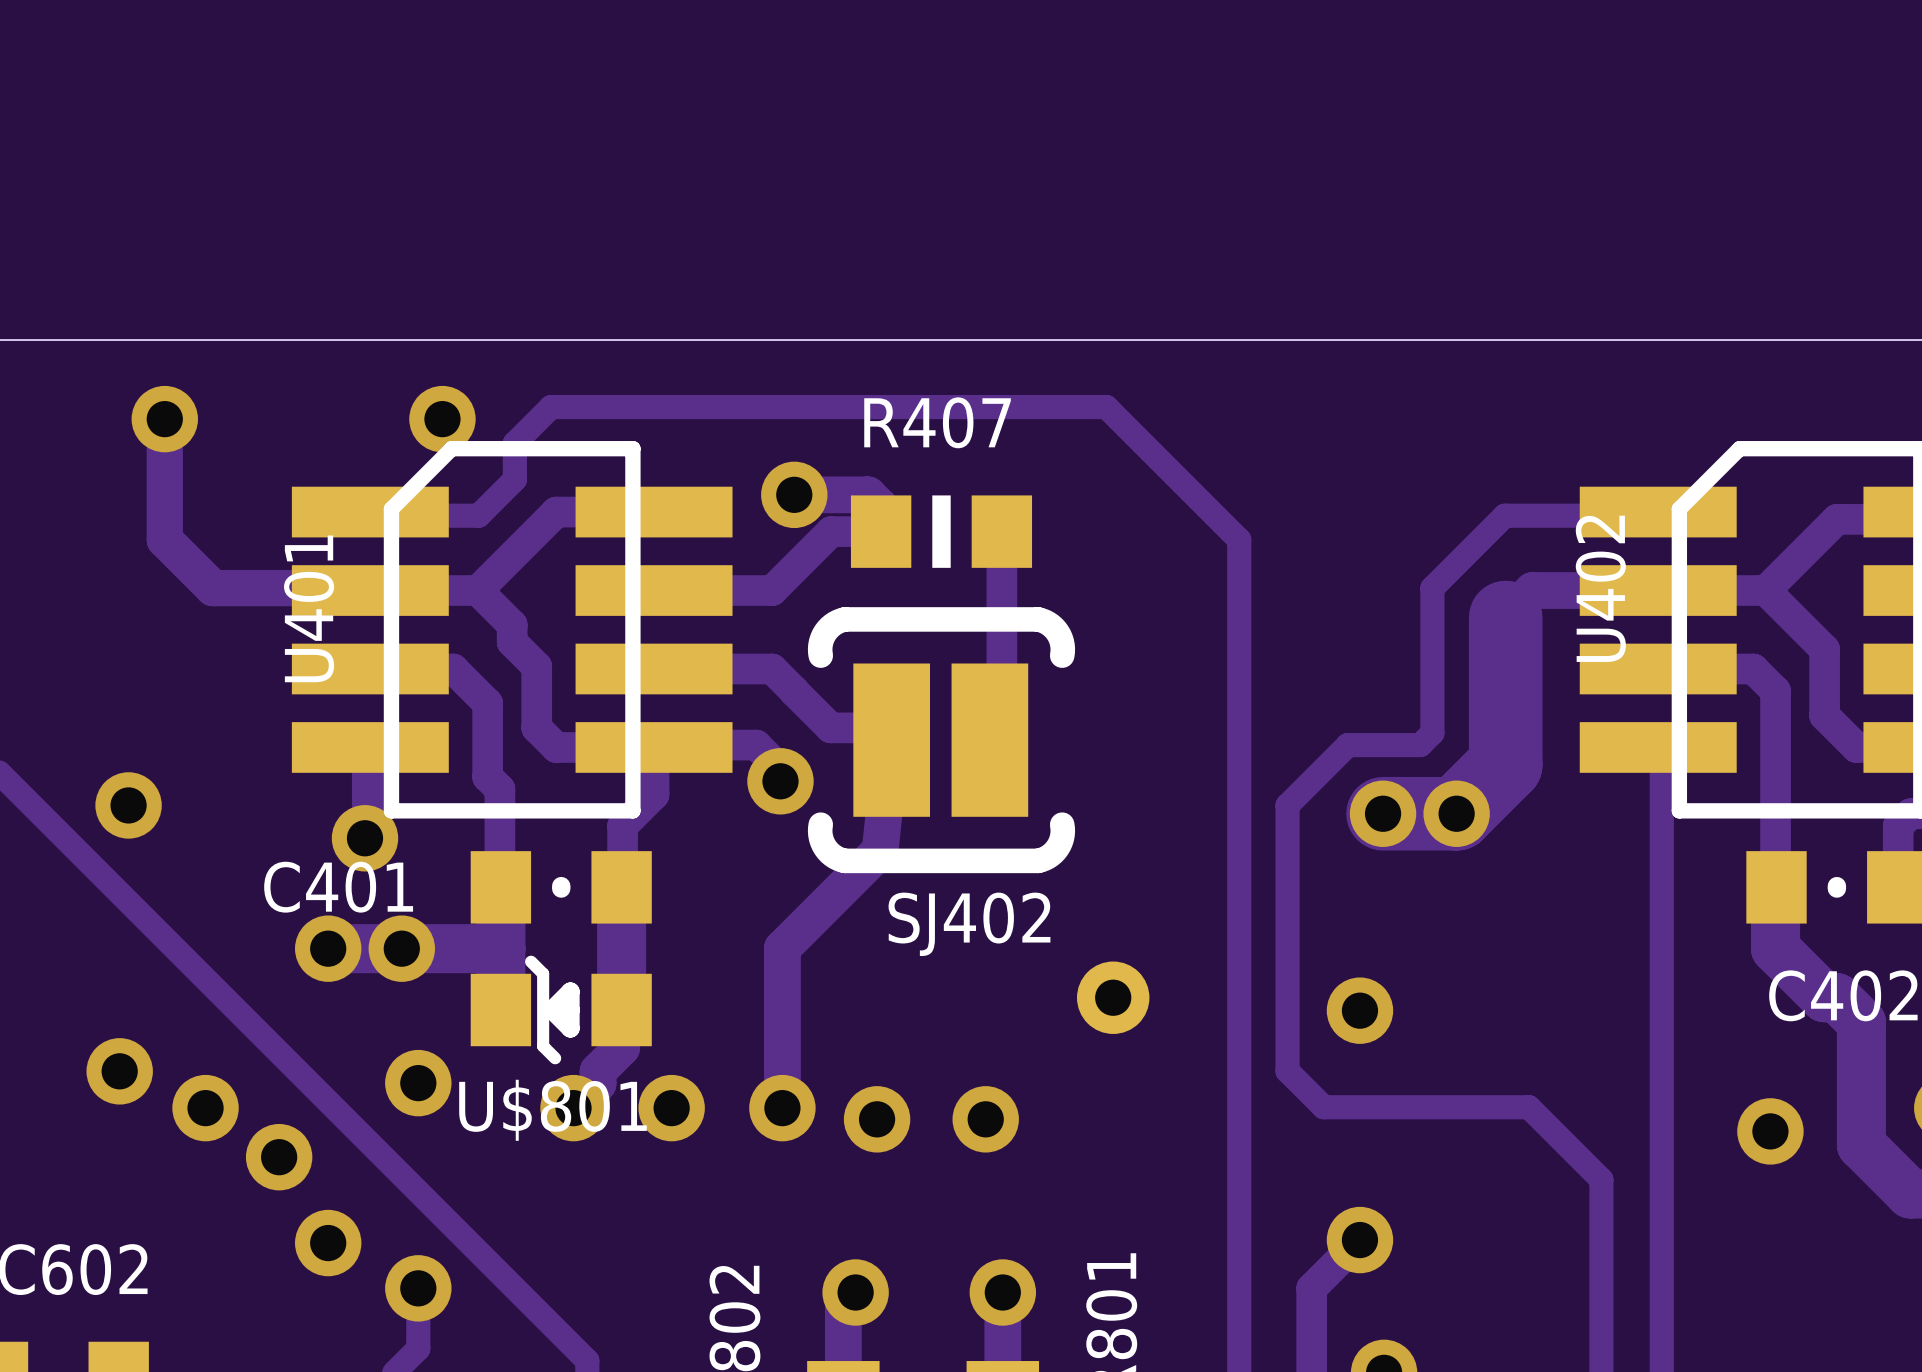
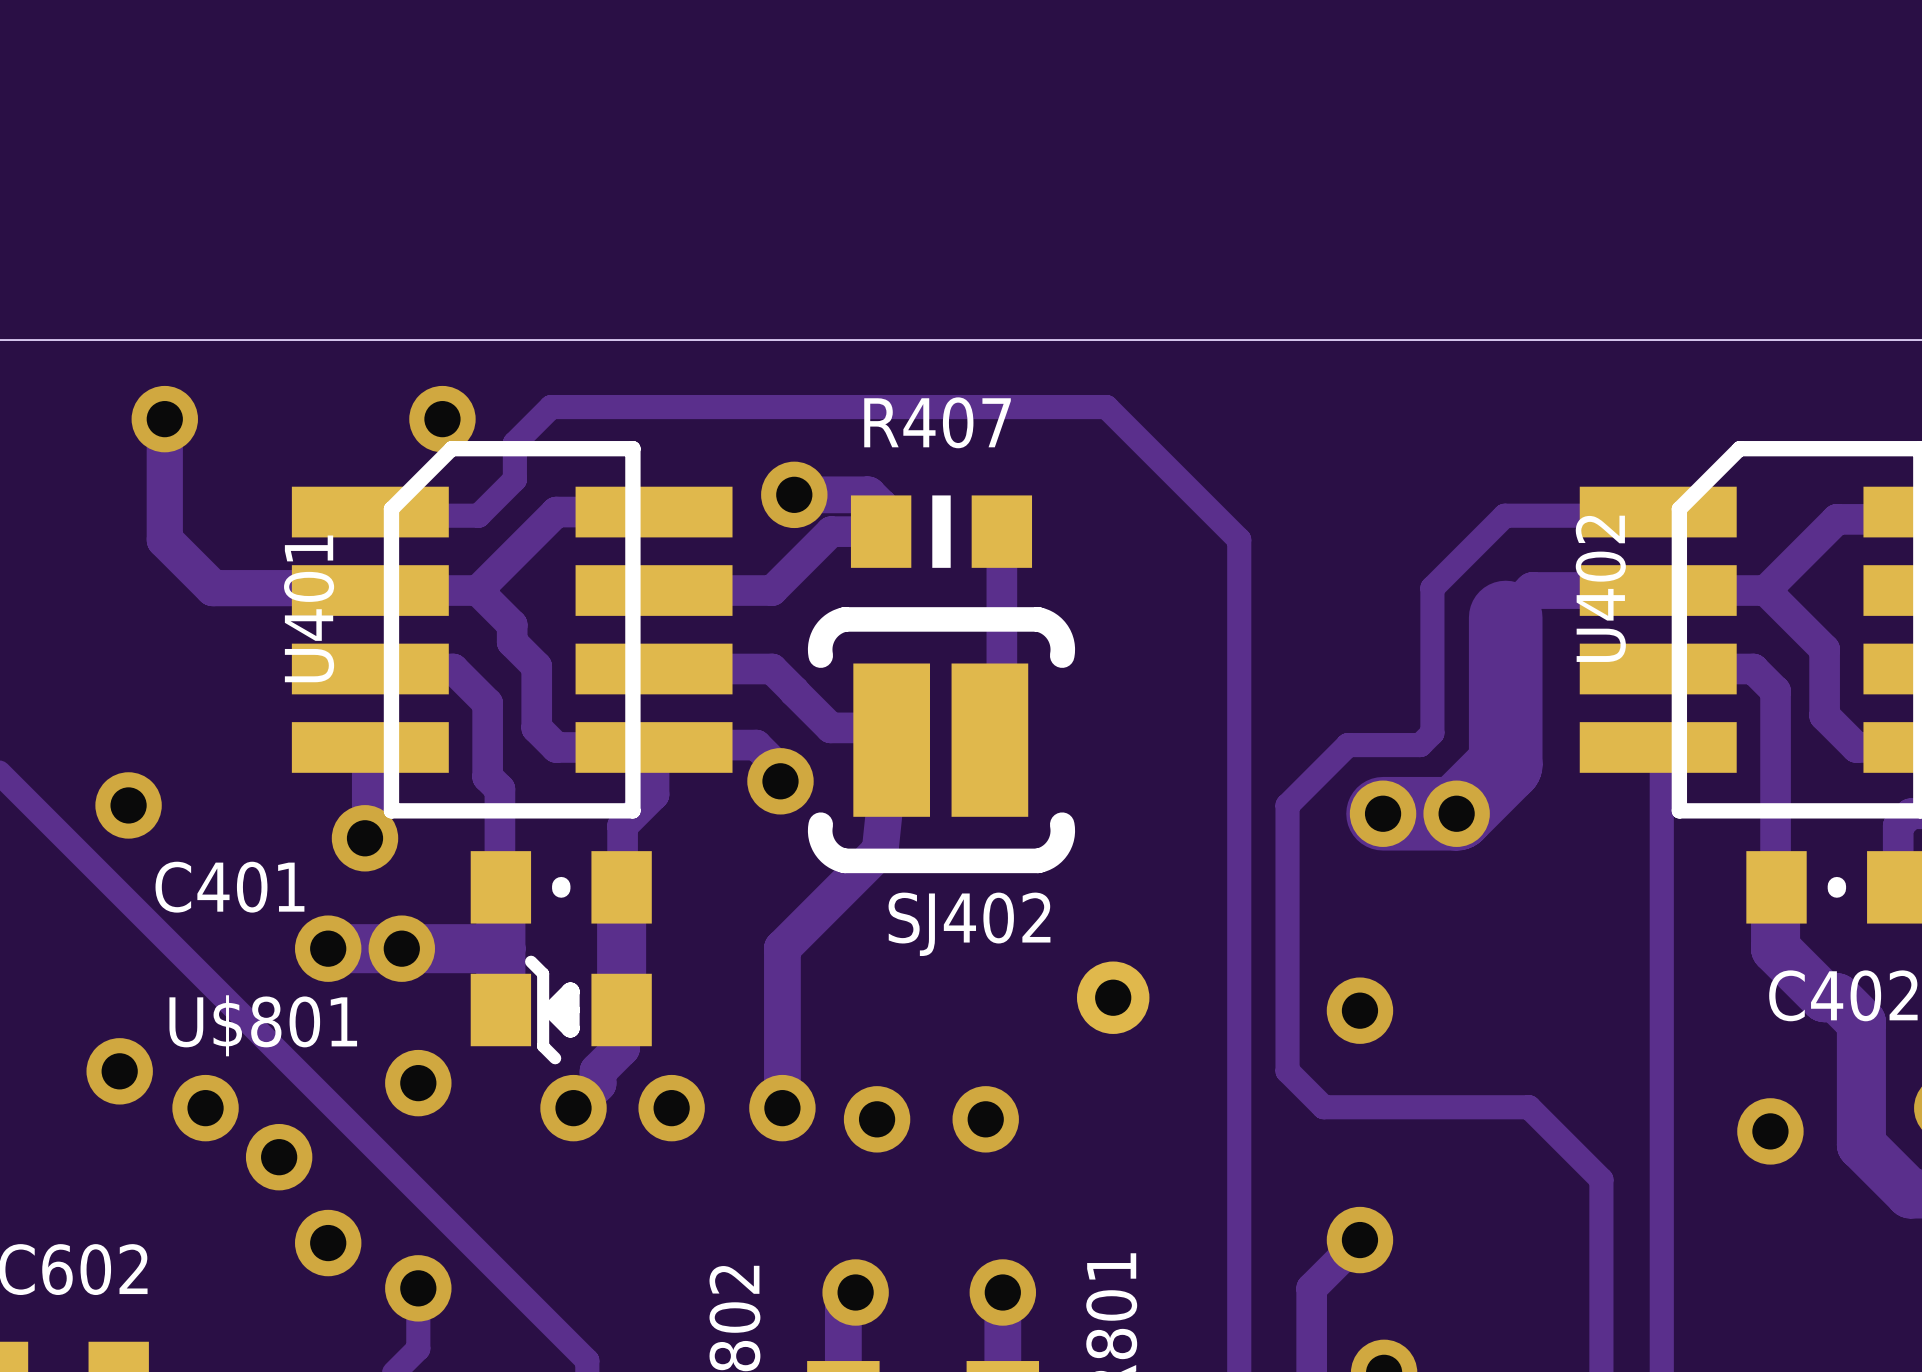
C401 name position: C401 (338, 887) -> C401 (229, 887)
U$801 name position: U$801 (552, 1110) -> U$801 (263, 1025)

